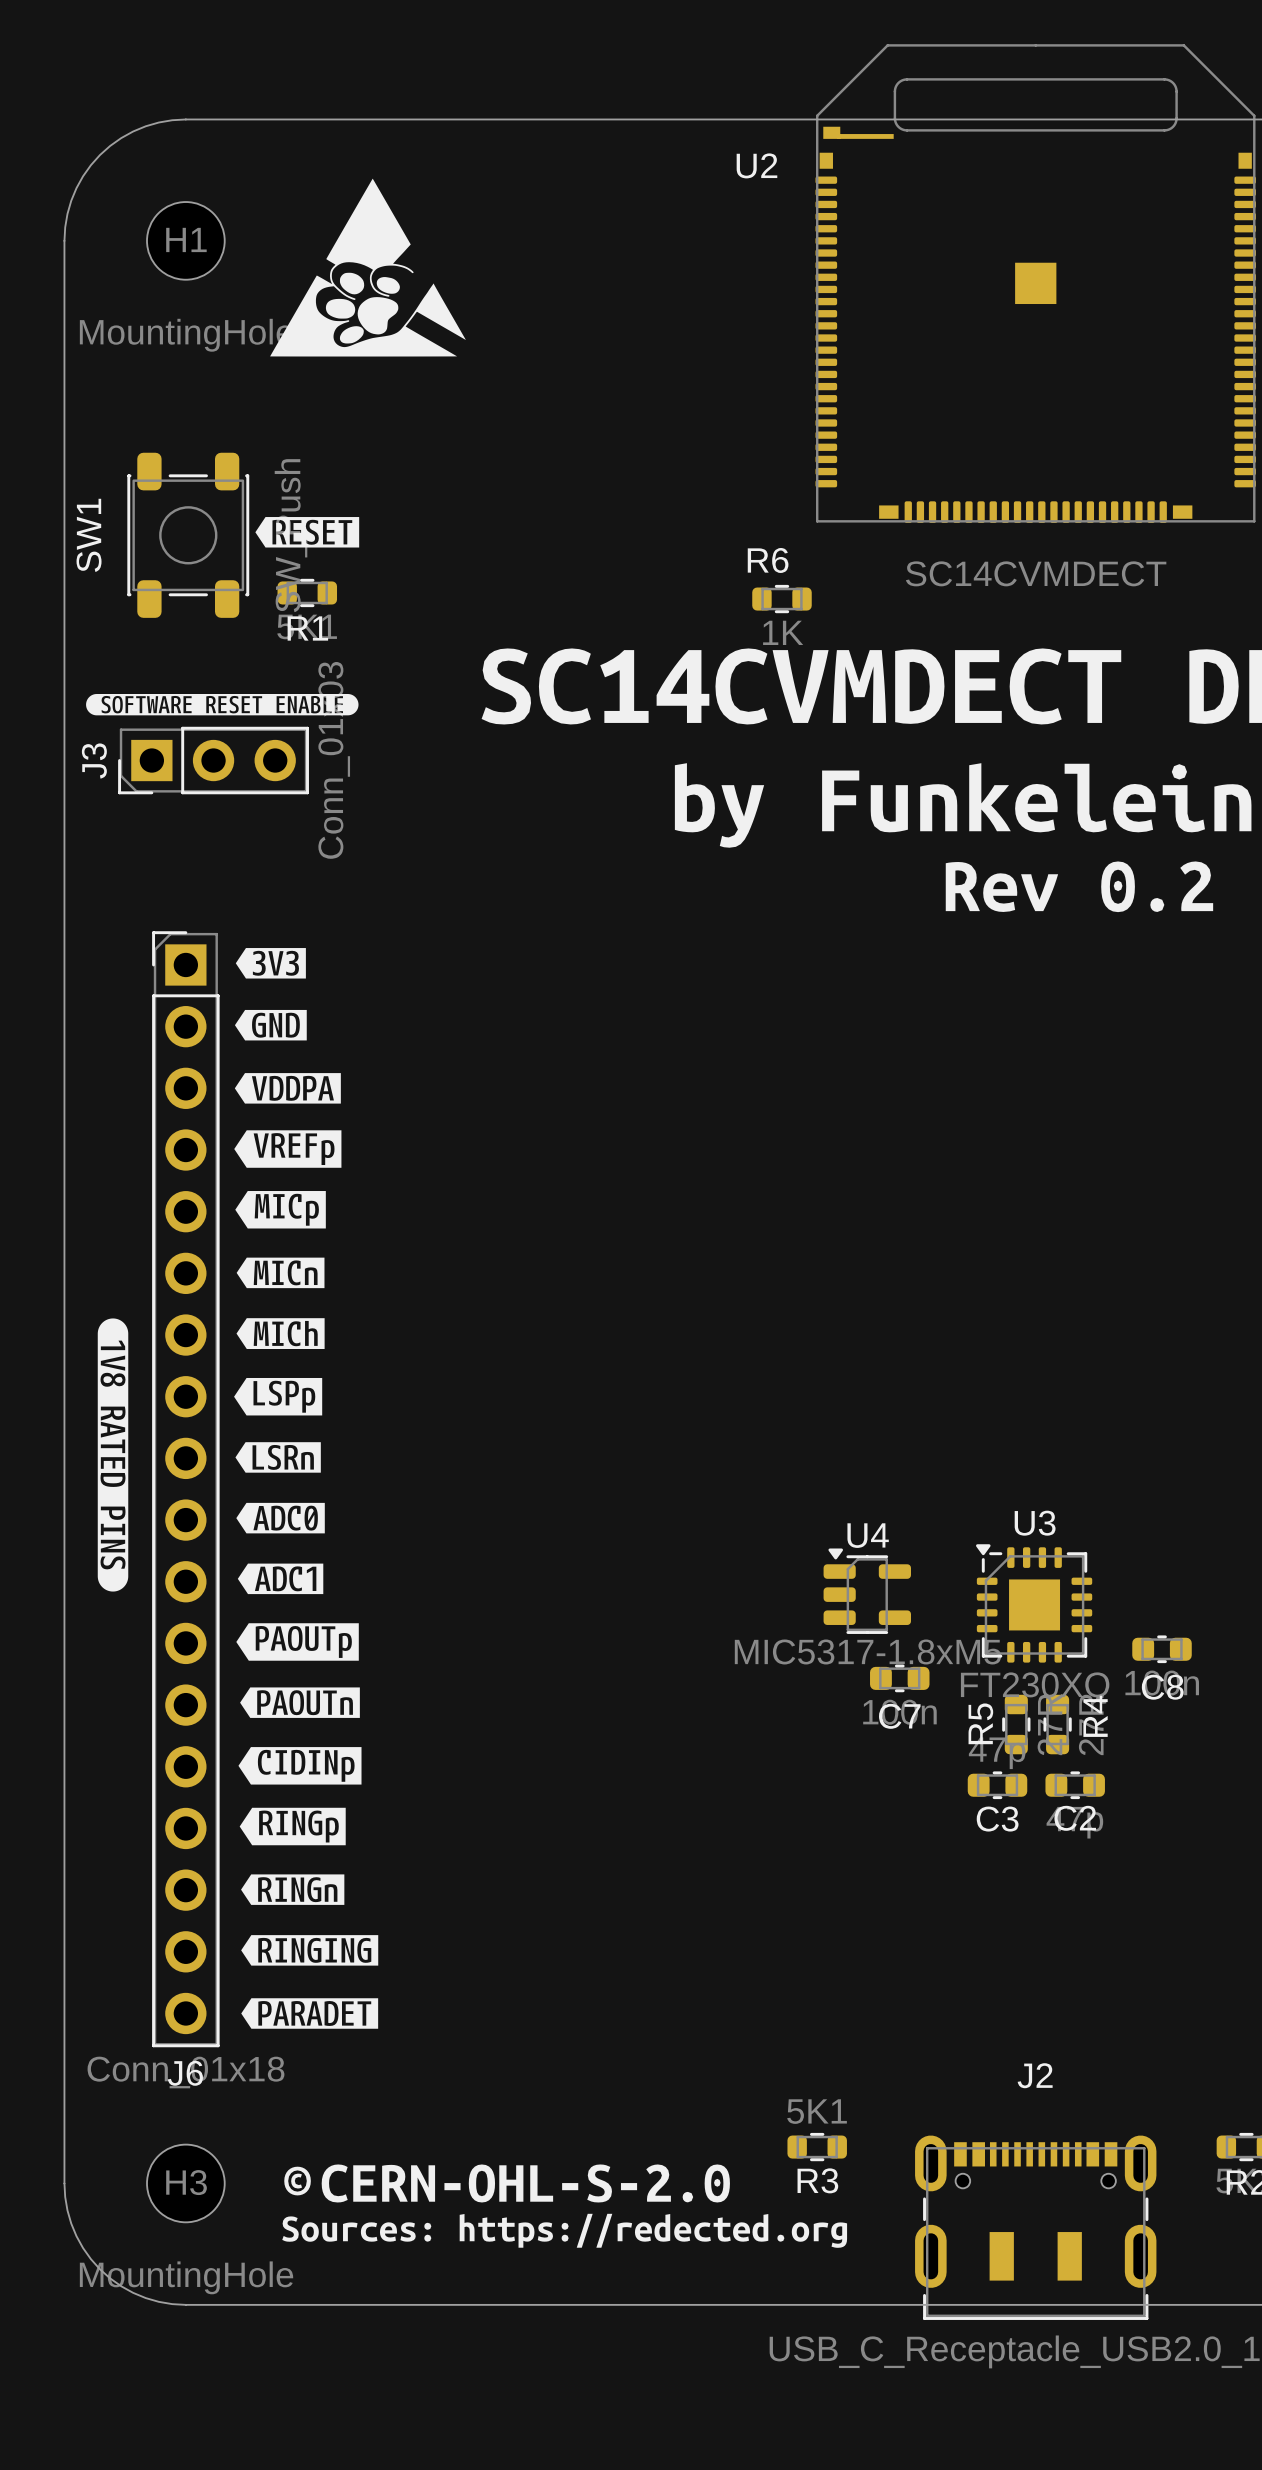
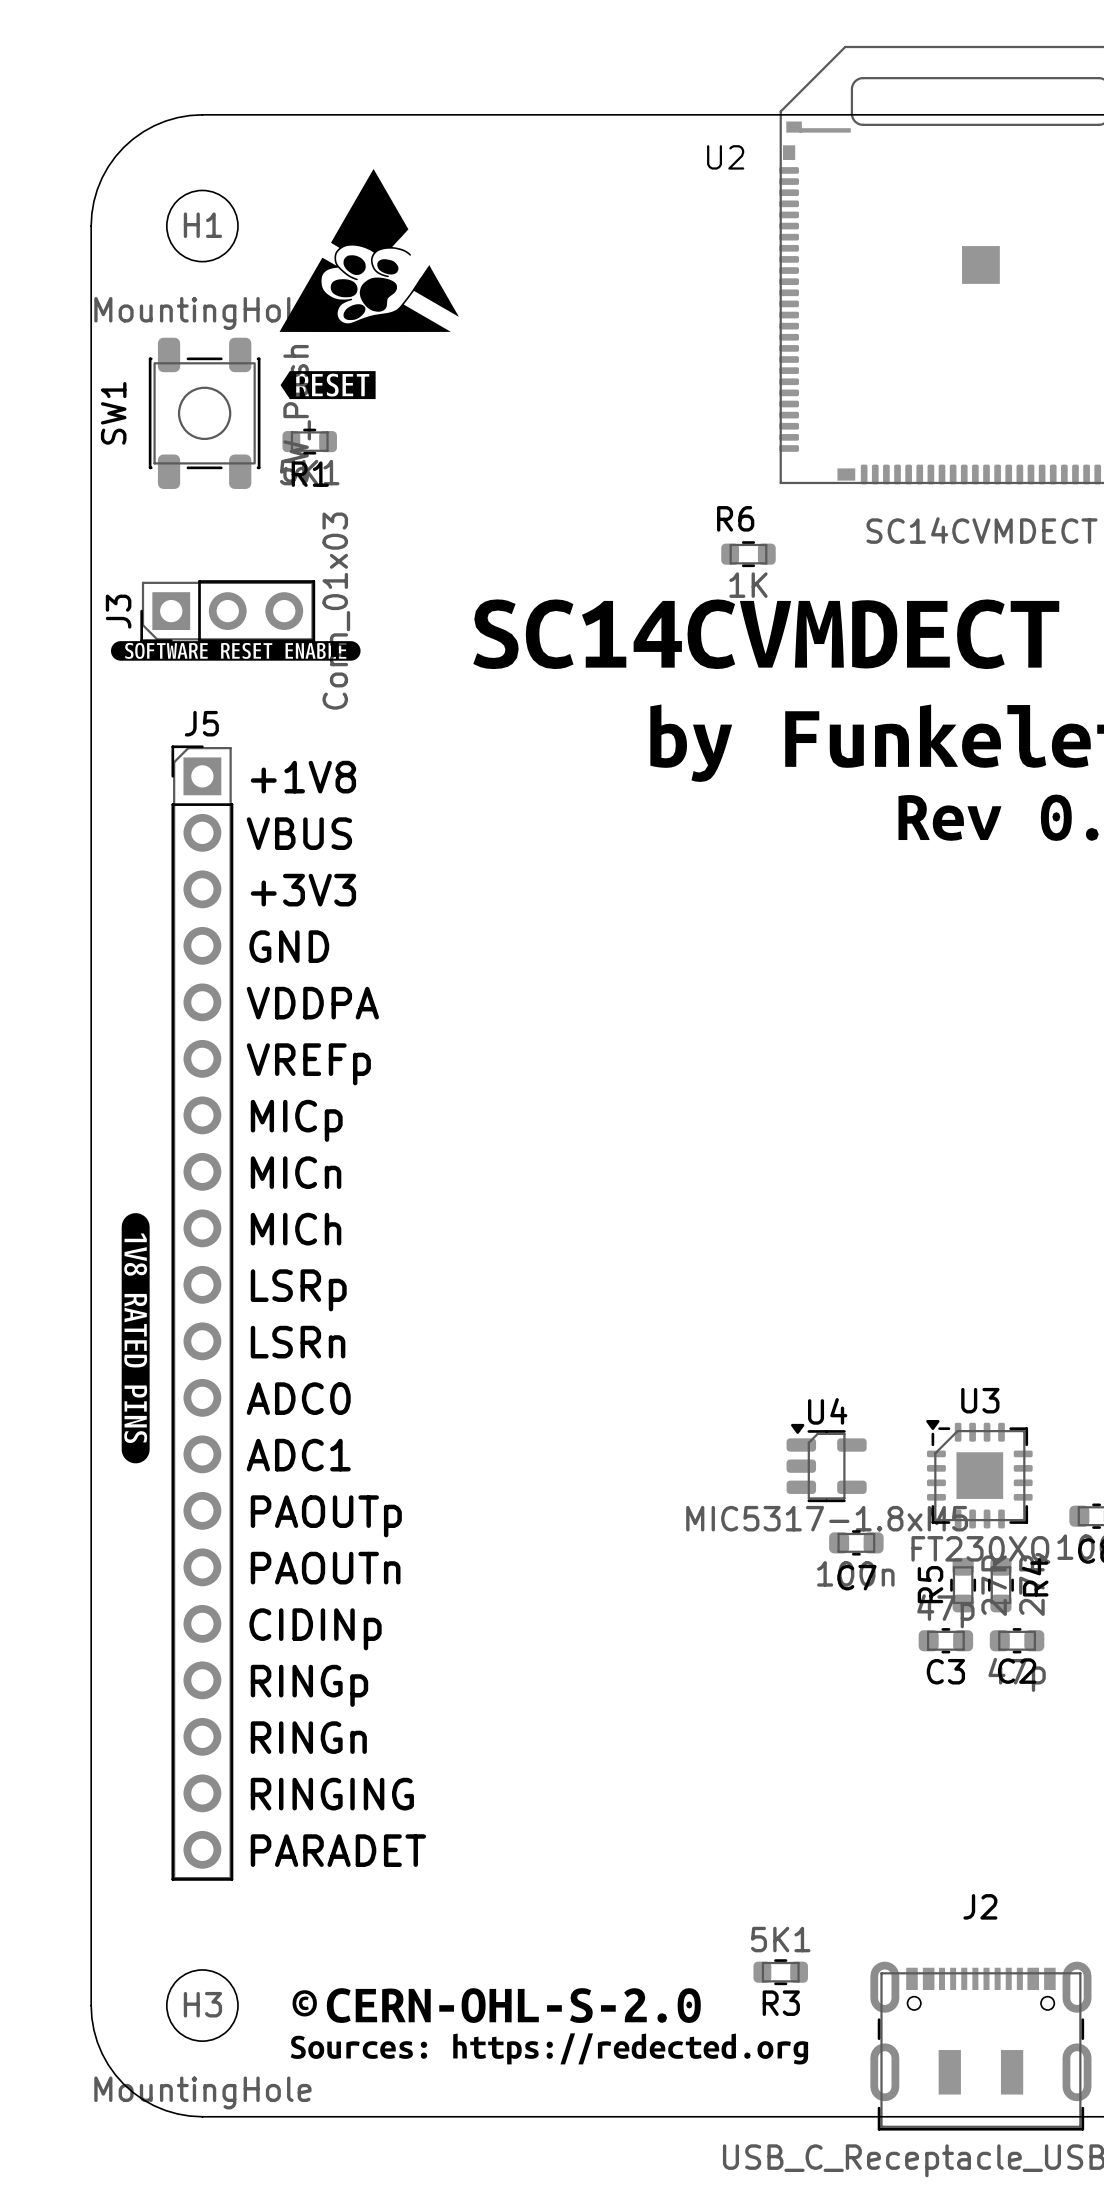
drawing position: (307, 532) -> (328, 385)
SW1 position: (188, 535) -> (204, 413)
R1 position: (307, 592) -> (309, 441)
J3 position: (213, 760) -> (227, 611)
text: none -> +1V8 (303, 777)
text: none -> VBUS (299, 833)
drawing: [235, 948, 306, 979] -> none
text: none -> +3V3 (303, 890)
drawing: [234, 1009, 307, 1041] -> none
text: none -> GND (289, 946)
drawing: [234, 1073, 342, 1229] -> none
text: none -> VDDPA (312, 1003)
text: none -> VREFp (308, 1064)
text: none -> MICp (296, 1120)
drawing: [236, 1257, 325, 1289] -> none
text: none -> MICn (296, 1172)
drawing: [234, 1318, 325, 1473] -> none
text: none -> MICh (296, 1229)
text: none -> LSRp (298, 1290)
J5: none -> (202, 1313)
text: none -> LSRn (298, 1342)
J6: Conn_01x18 (185, 1489) -> none
drawing: [236, 1502, 325, 1534] -> none
text: none -> ADC0 (298, 1398)
drawing: [237, 1563, 324, 1595] -> none
text: none -> ADC1 (298, 1455)
drawing: [236, 1623, 360, 1718] -> none
text: none -> PAOUTp (326, 1516)
text: none -> PAOUTn (325, 1568)
drawing: [238, 1747, 362, 1846] -> none
text: none -> CIDINp (315, 1629)
text: none -> RINGp (309, 1685)
drawing: [241, 1874, 345, 1905] -> none
text: none -> RINGn (308, 1737)
drawing: [241, 1935, 379, 1966] -> none
text: none -> RINGING (332, 1794)
drawing: [241, 1998, 379, 2029] -> none
text: none -> PARADET (338, 1850)

